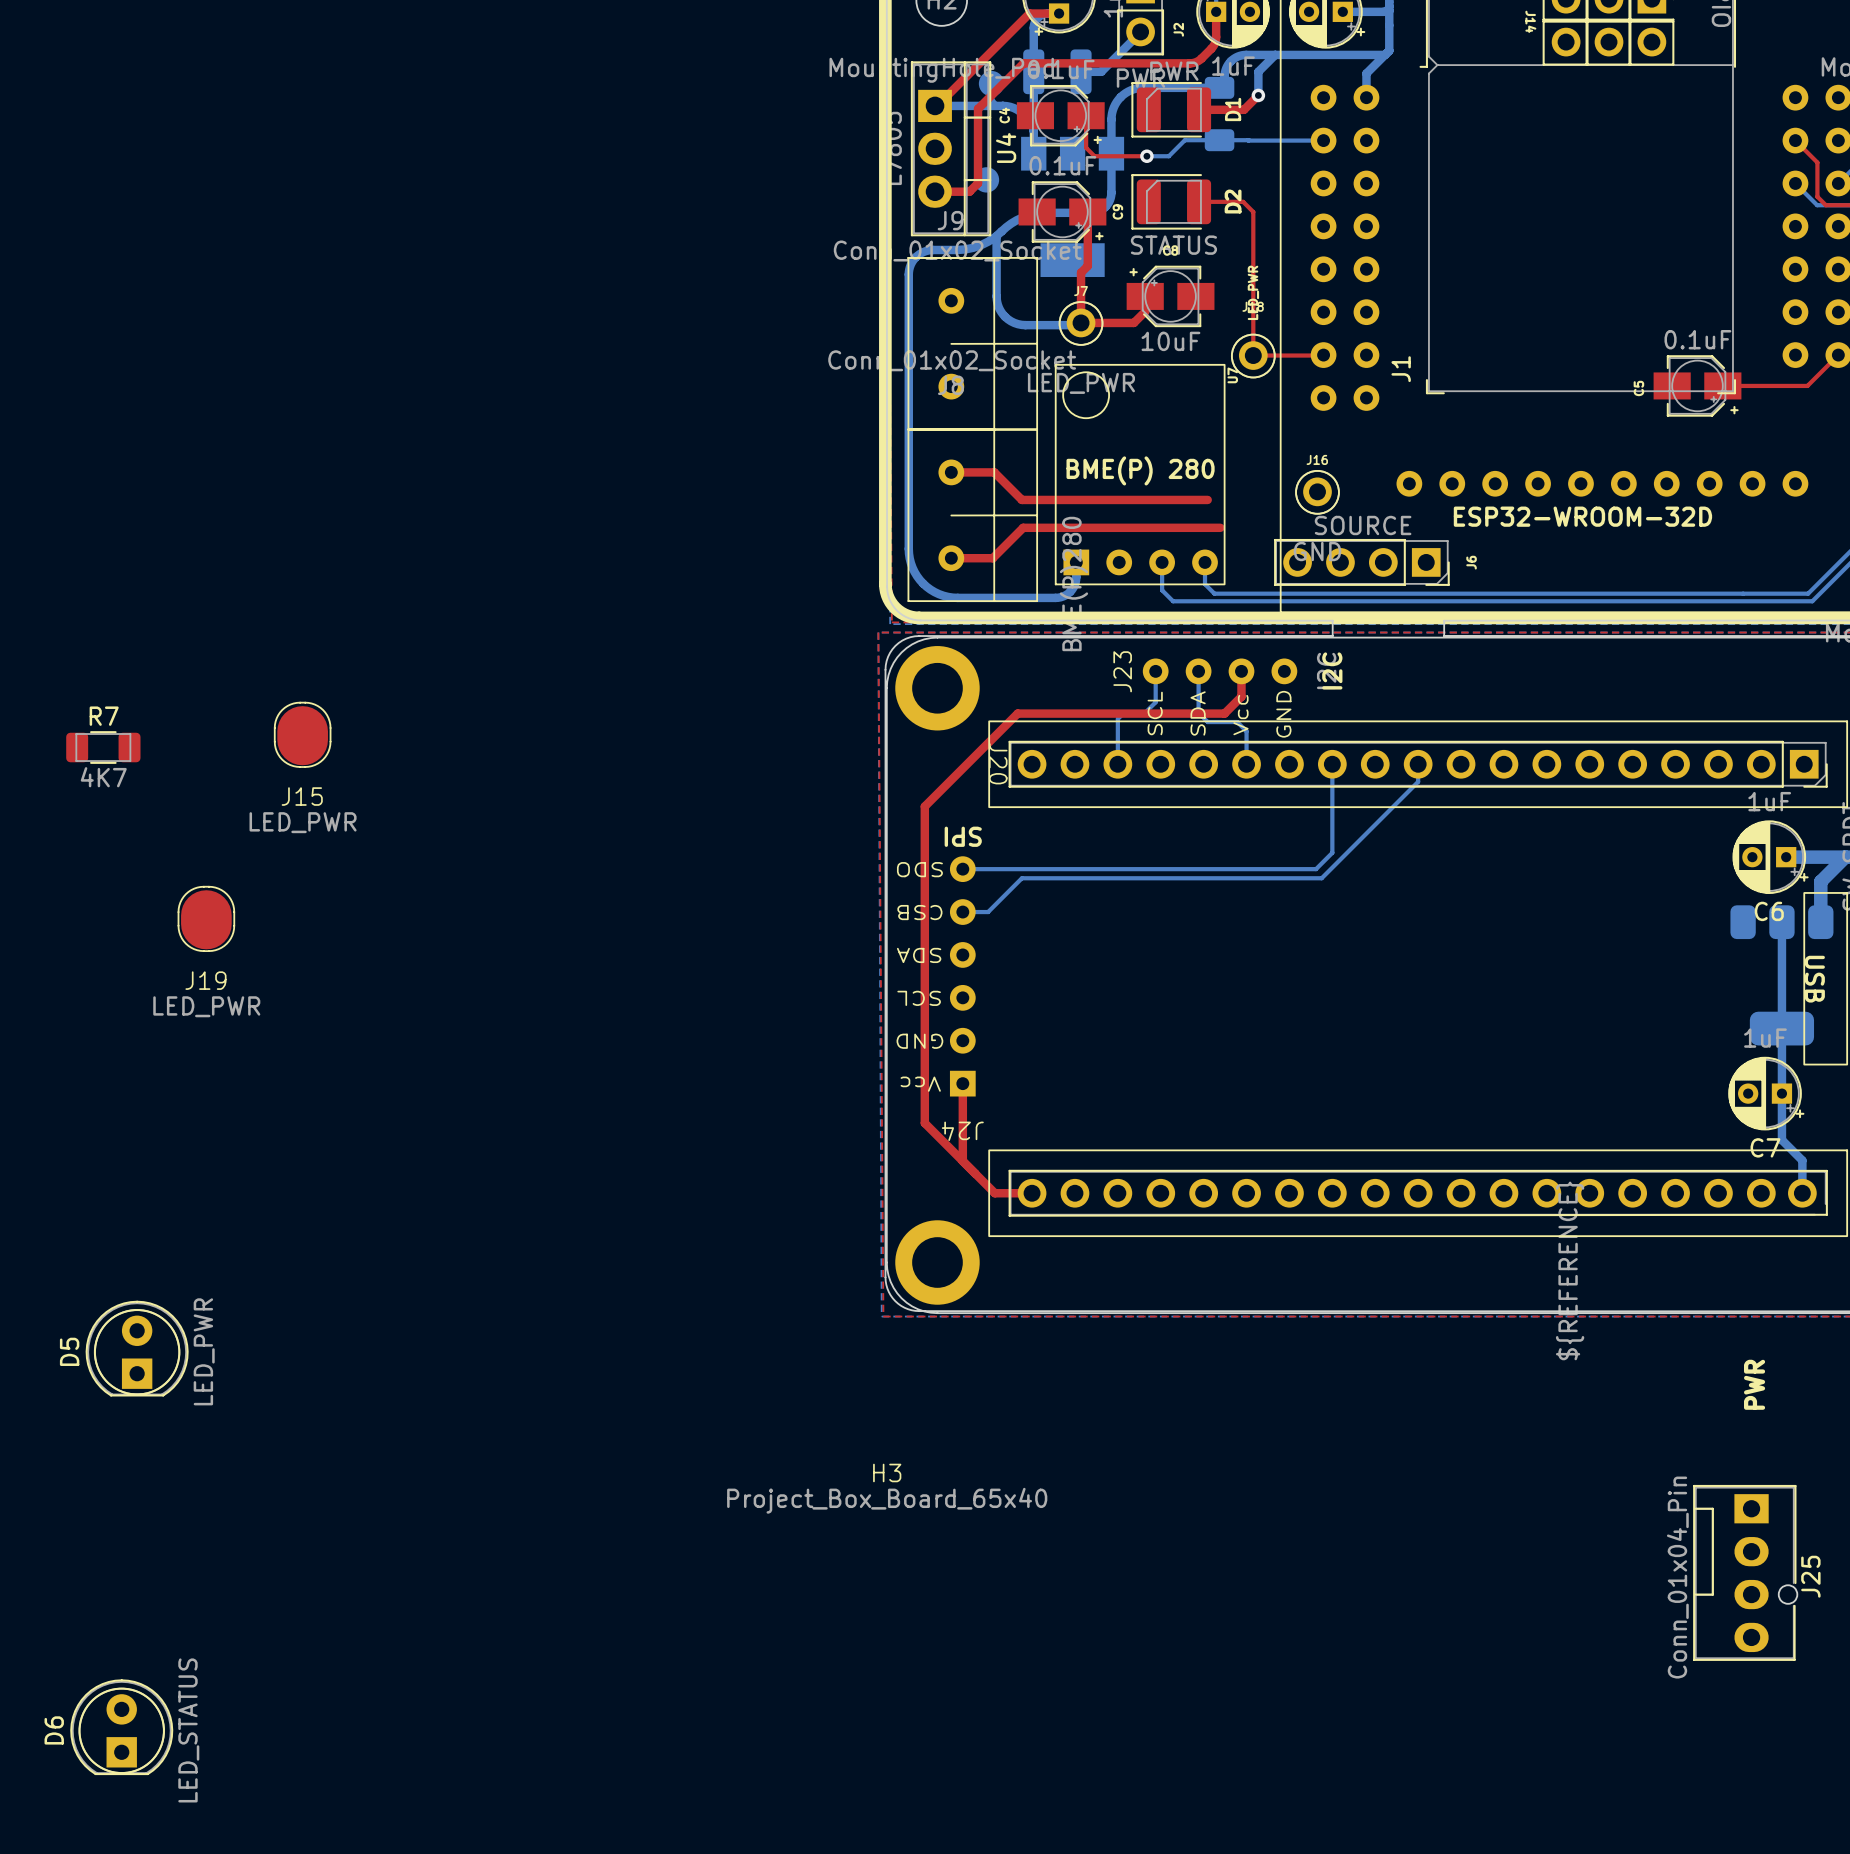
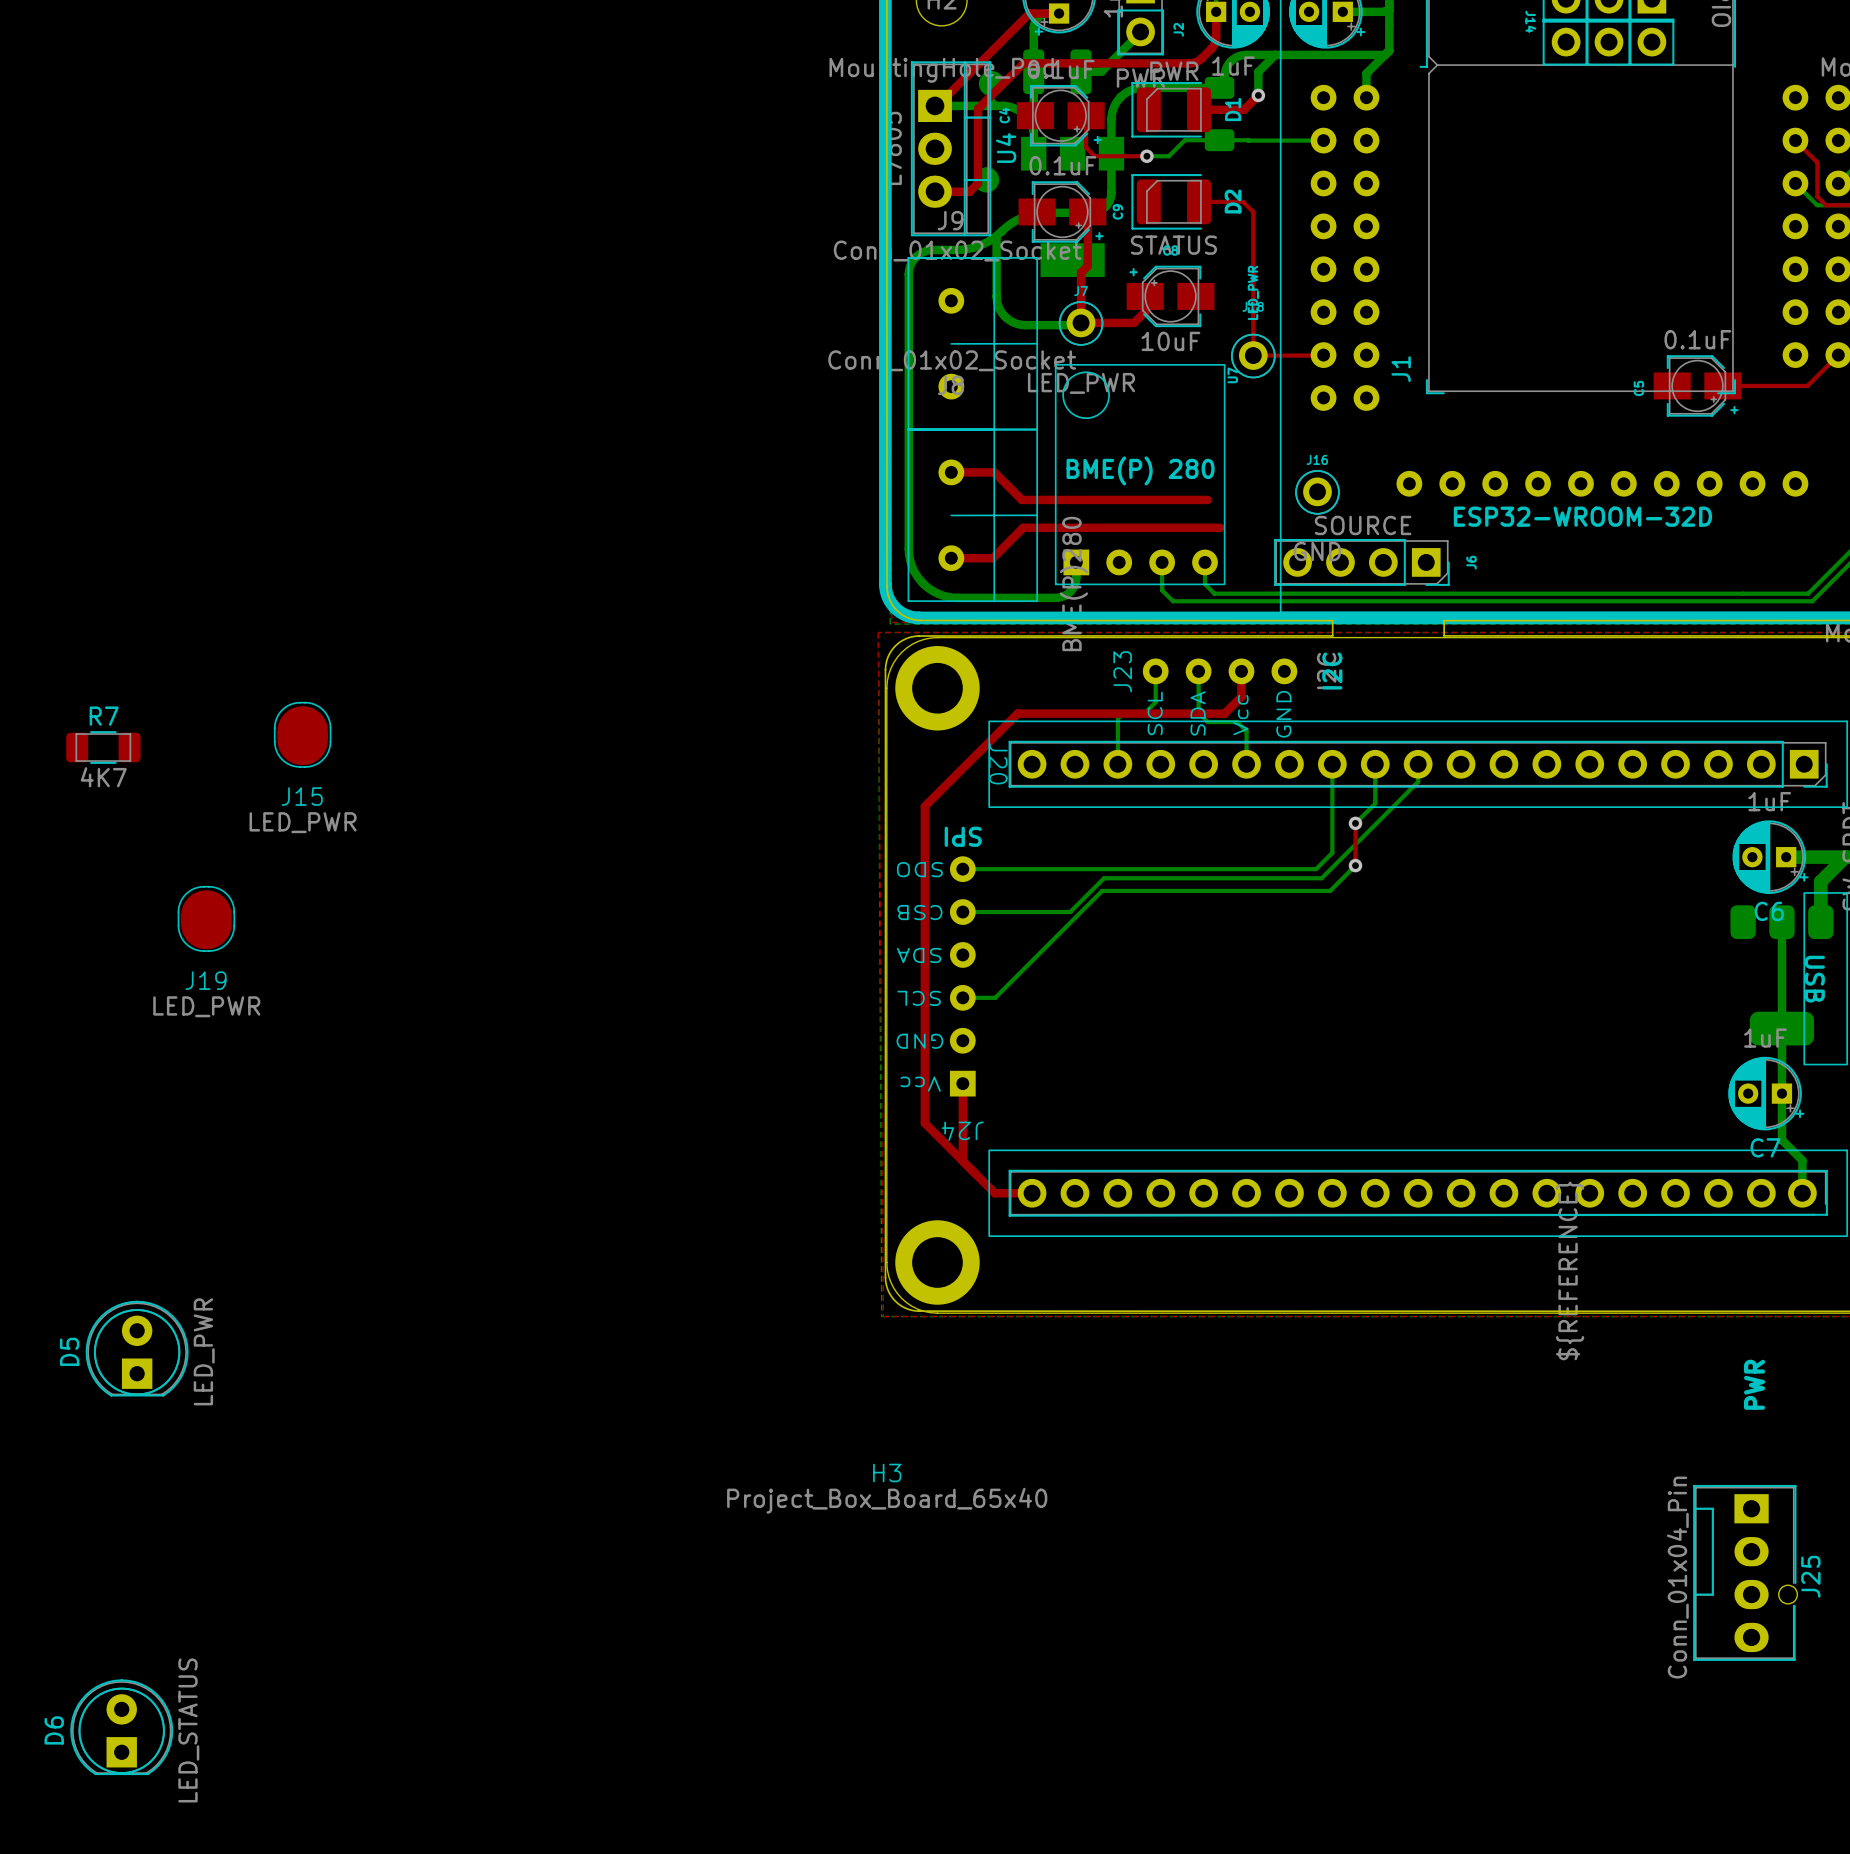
bottom track: none -> (1375, 764) (1375, 803) (1355, 823)
top track: none -> (1355, 823) (1355, 865)
via: none -> (1355, 823)
bottom track: none -> (1355, 865) (1330, 890) (1102, 890) (995, 997) (962, 997)
via: none -> (1355, 865)
bottom track: (1104, 878) (1021, 878) (988, 912) -> (1104, 878) (1070, 912) (988, 912)

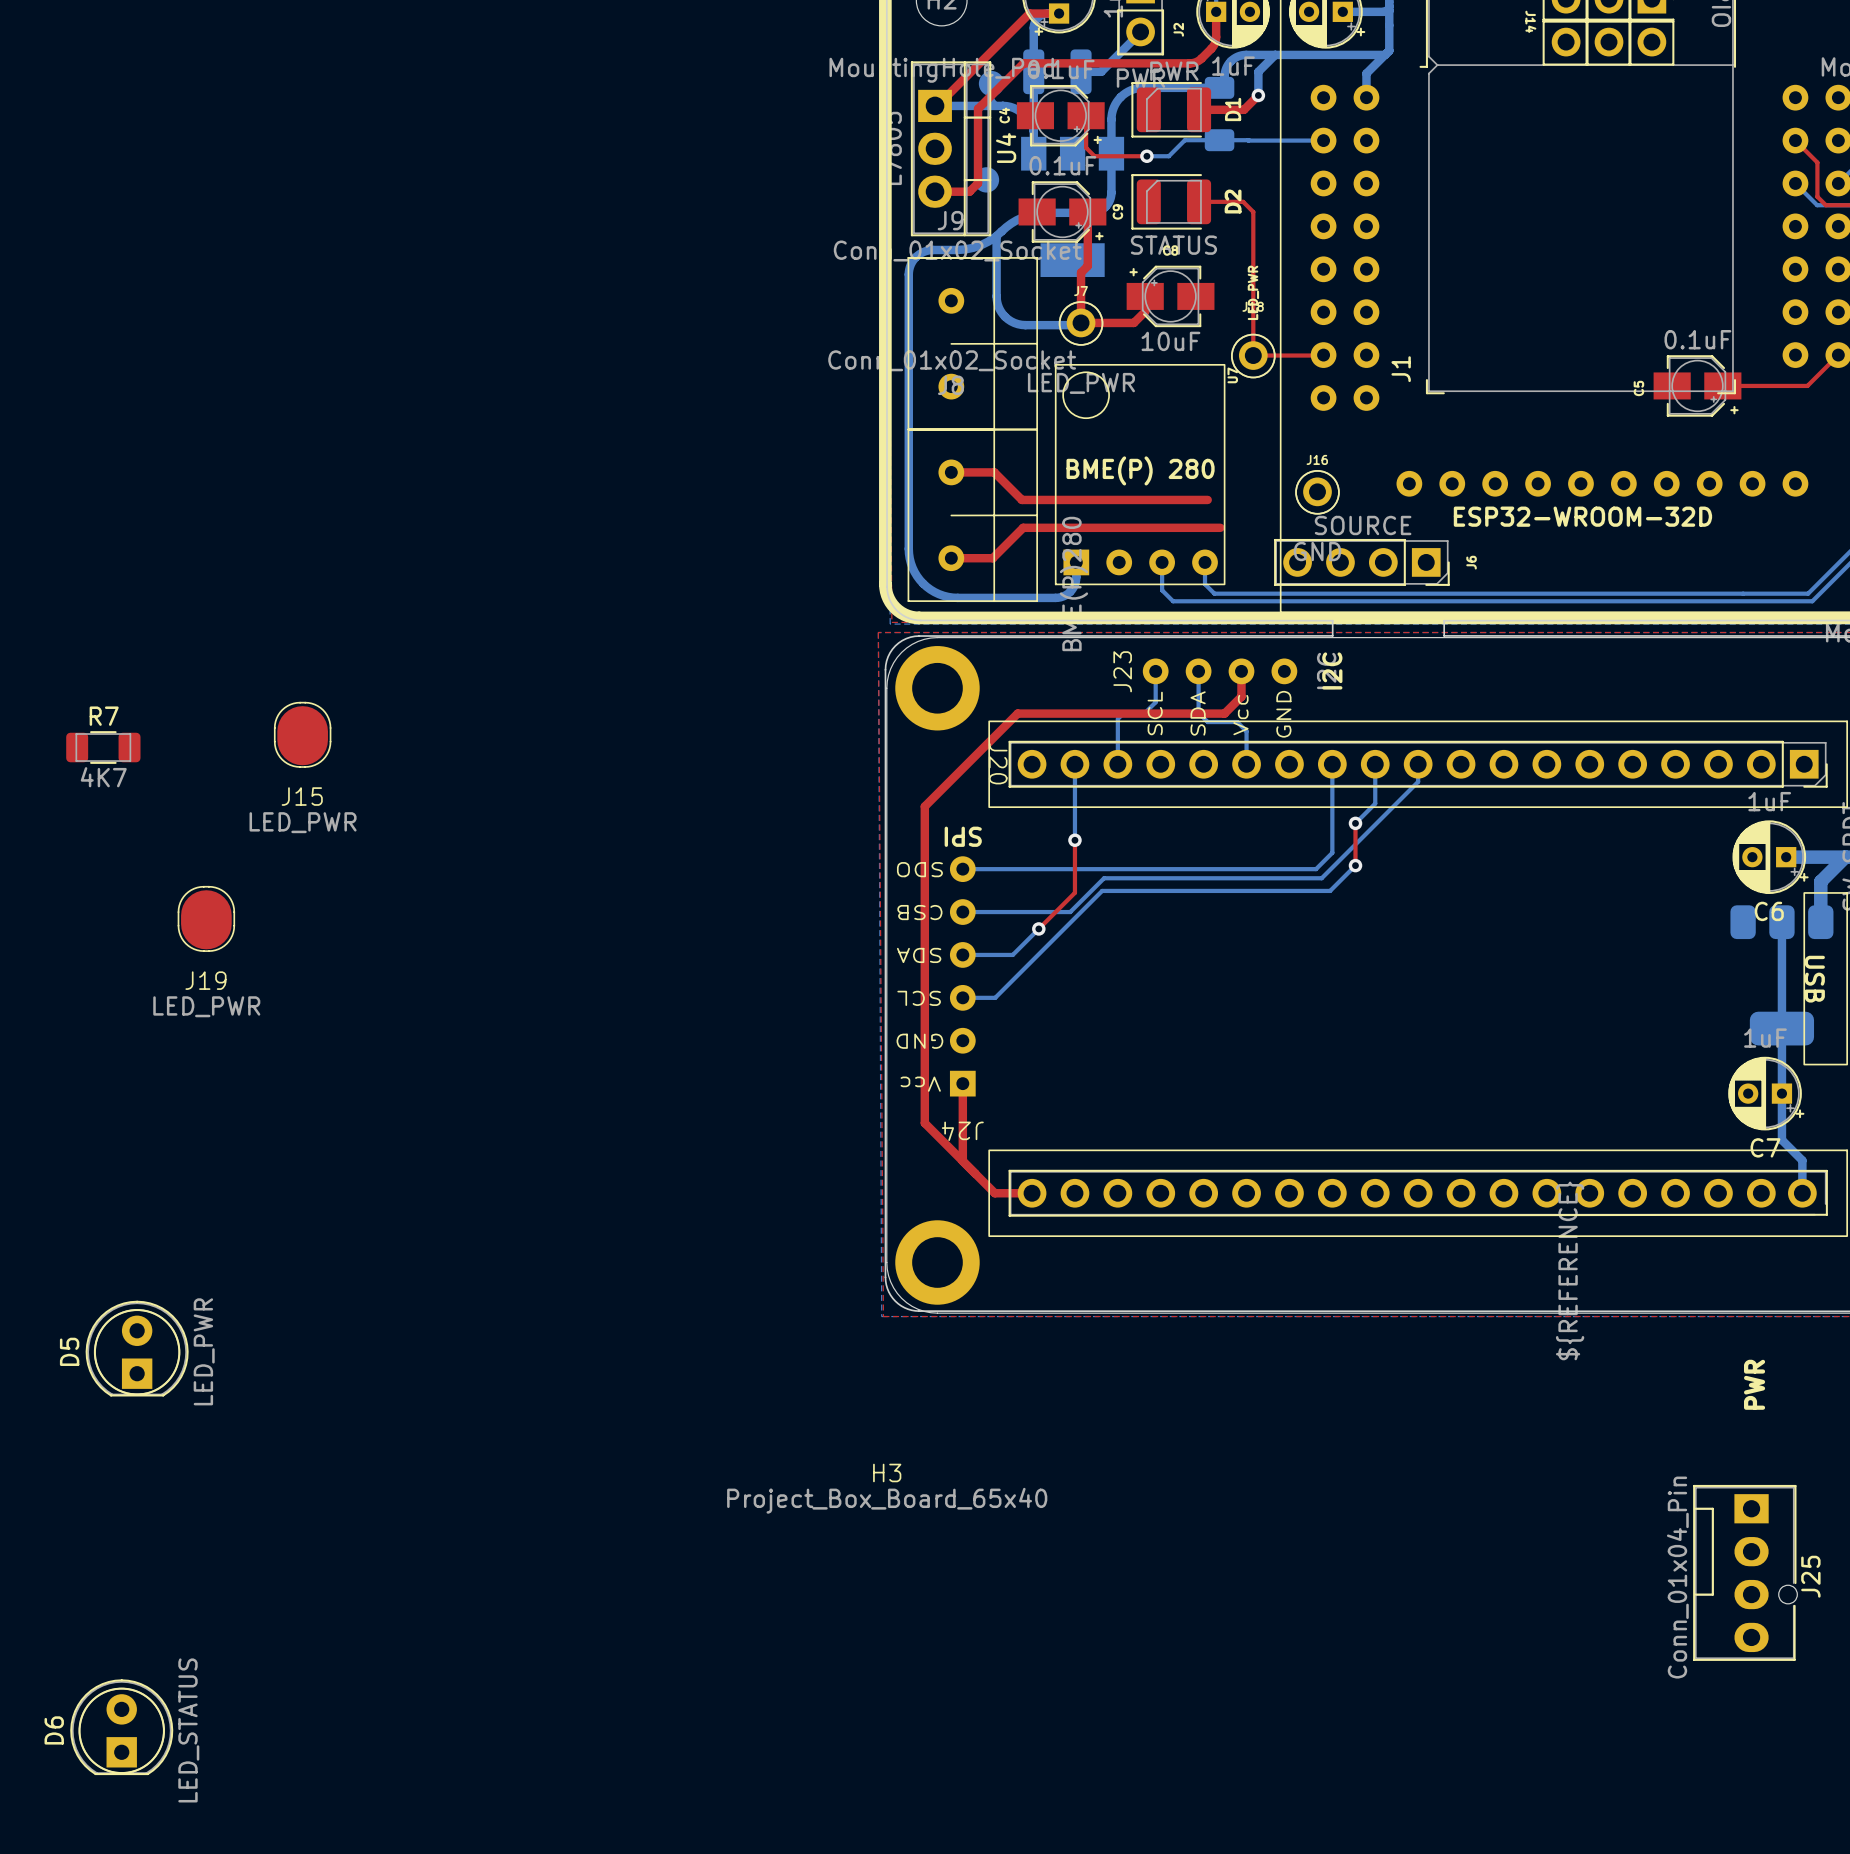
bottom track: none -> (1074, 764) (1074, 840)
top track: none -> (1074, 840) (1074, 892) (1038, 928)
via: none -> (1074, 840)
bottom track: none -> (1038, 928) (1012, 954) (962, 954)
via: none -> (1038, 928)

